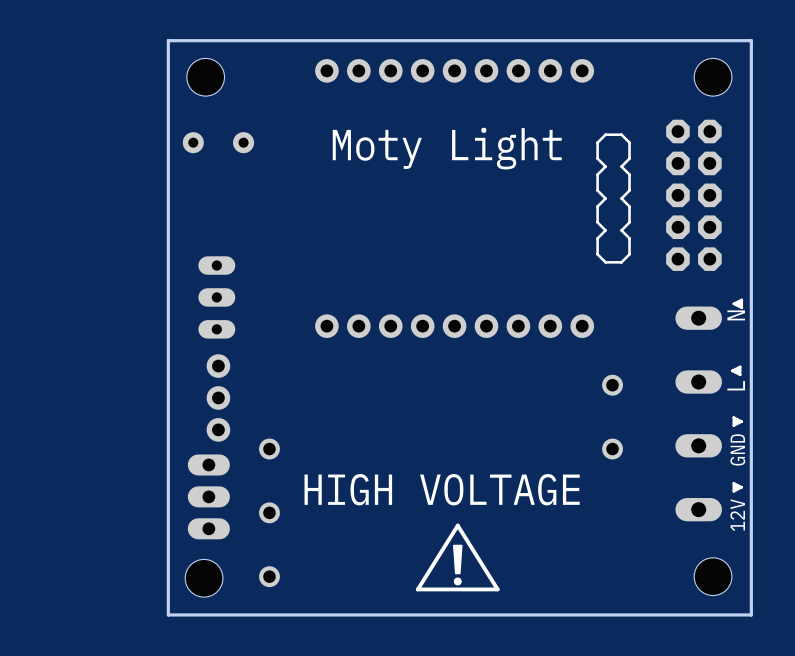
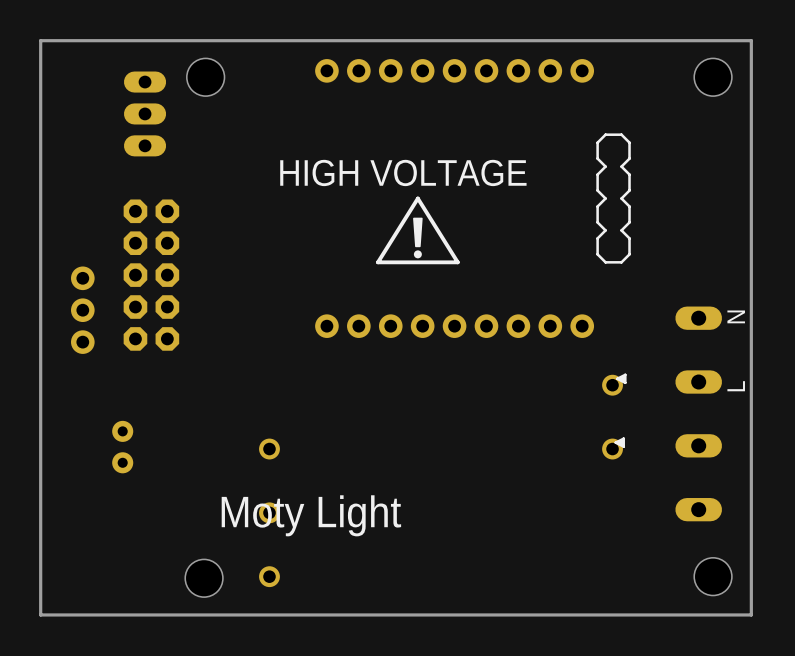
board edge: (168, 40) (168, 614) -> (168, 40) (40, 40) (40, 614) (168, 614)
part: none -> (145, 113)
part: (218, 142) -> none
text: Moty Light (447, 148) -> none
text: none -> HIGH VOLTAGE (403, 172)
part: (693, 195) -> none
drawing: none -> [376, 196, 460, 265]
part: none -> (151, 275)
part: (216, 297) -> none
drawing: [732, 298, 744, 310] -> none
drawing: [730, 365, 742, 377] -> none
drawing: none -> [616, 373, 627, 385]
part position: (218, 397) -> (82, 310)
drawing: [732, 416, 744, 427] -> none
drawing: none -> [614, 437, 625, 448]
part: none -> (122, 447)
text: GND (737, 449) -> none
drawing: [732, 482, 744, 493] -> none
text: HIGH VOLTAGE (442, 489) -> none
part: (208, 496) -> none
text: none -> Moty Light (311, 515)
text: 12V (737, 515) -> none
drawing: [415, 523, 500, 592] -> none

